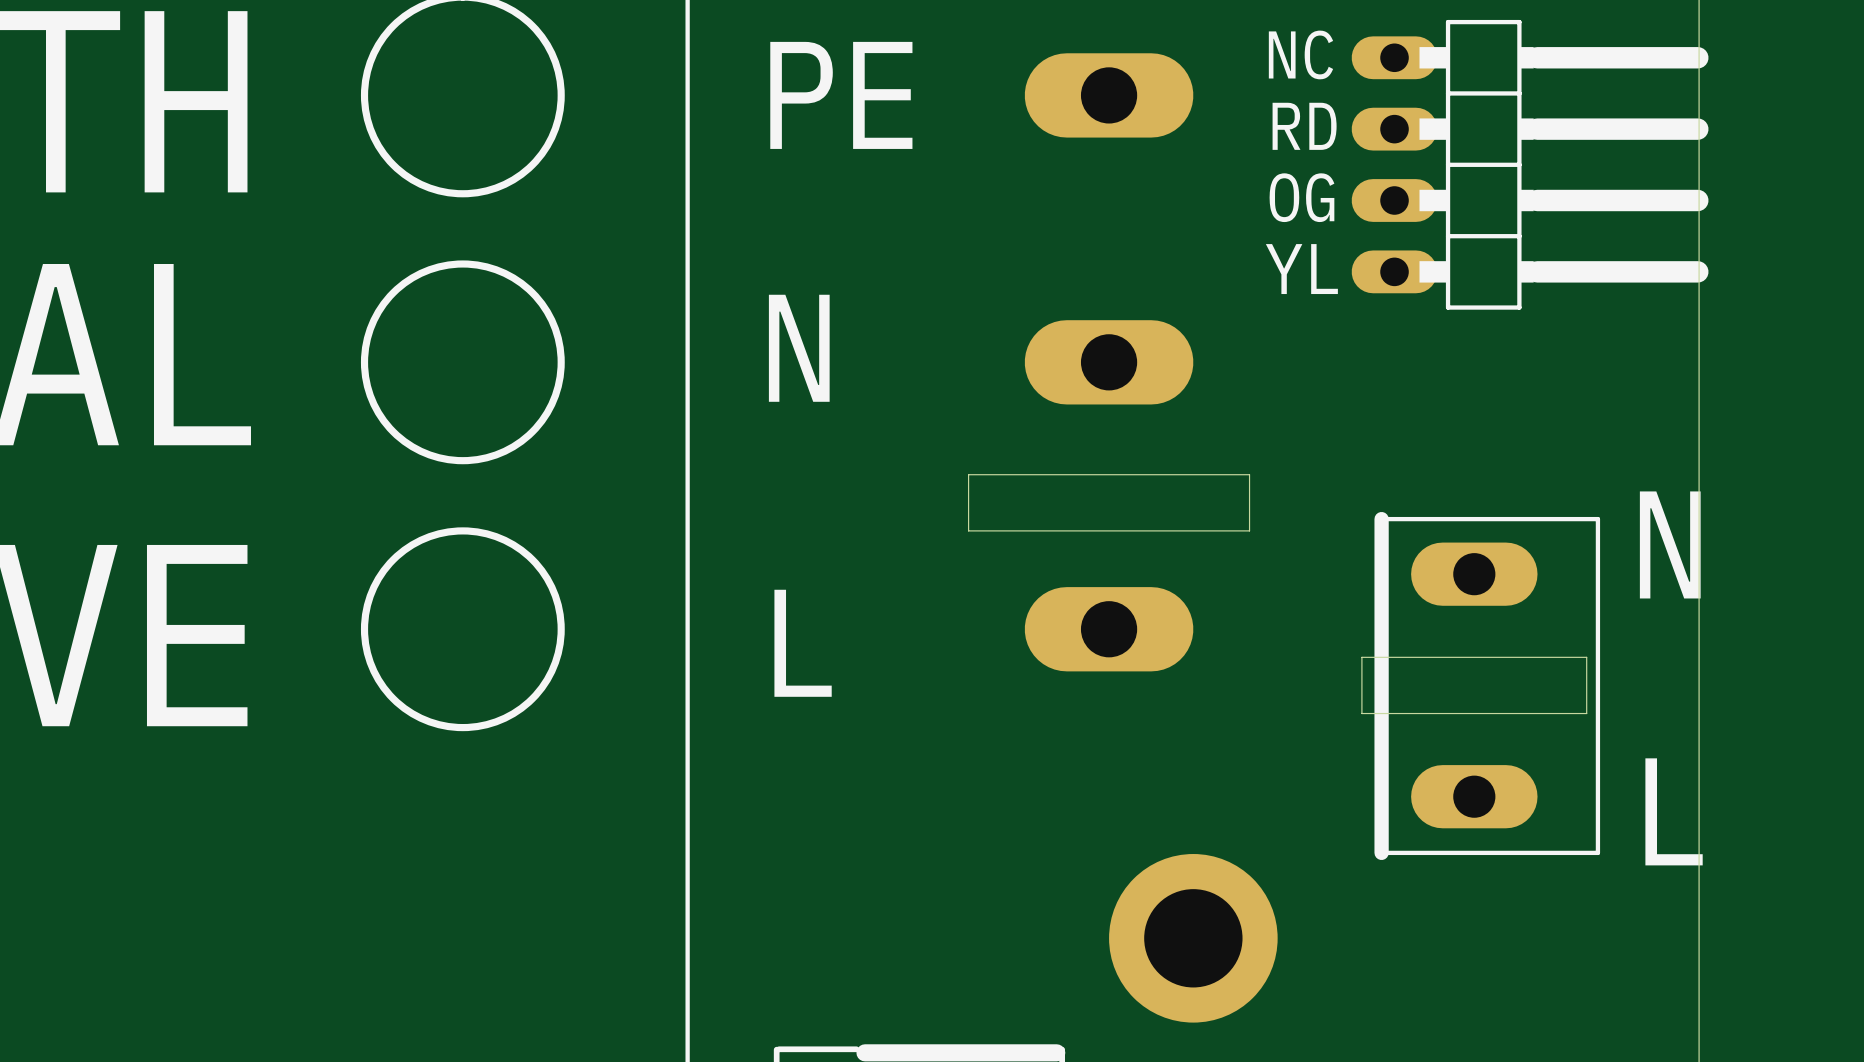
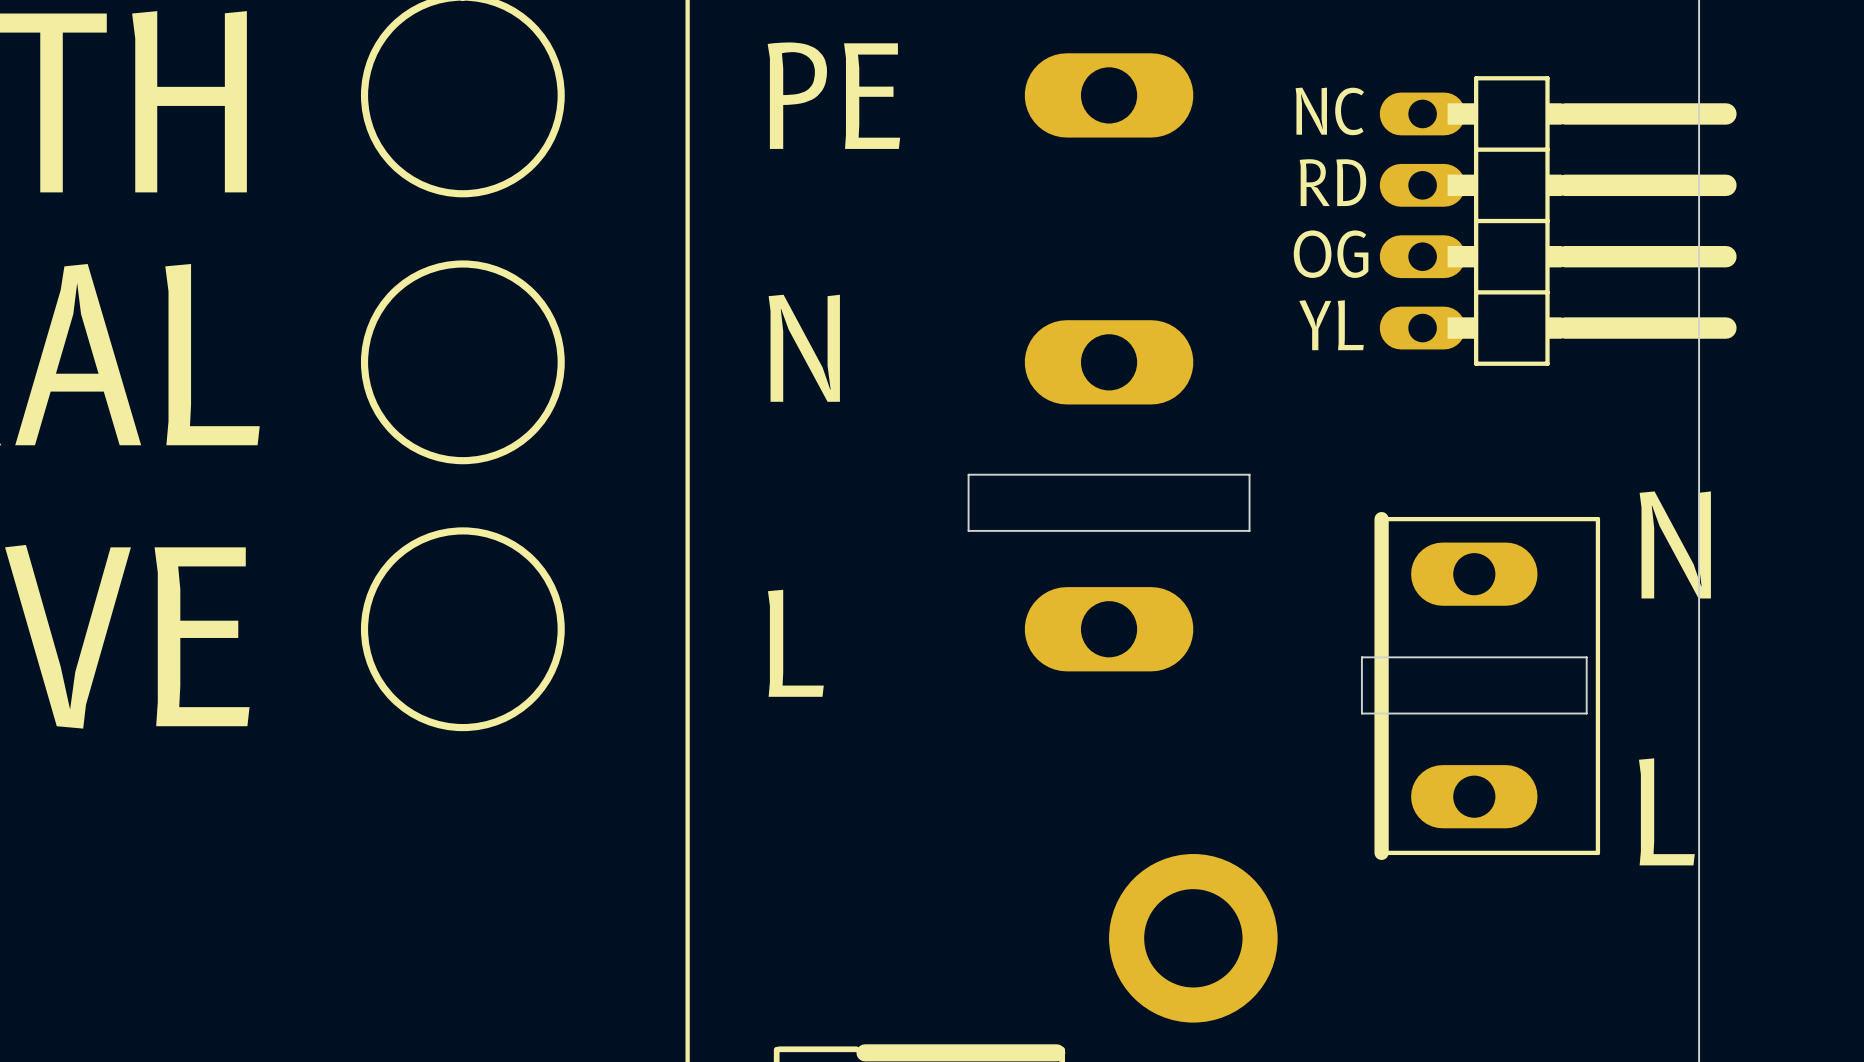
text position: NC (1300, 54) -> NC (1329, 111)
text position: RD (1304, 126) -> RD (1332, 182)
part position: (1530, 164) -> (1558, 221)
text position: OG (1301, 197) -> OG (1331, 254)
text position: YL (1301, 269) -> YL (1331, 325)

